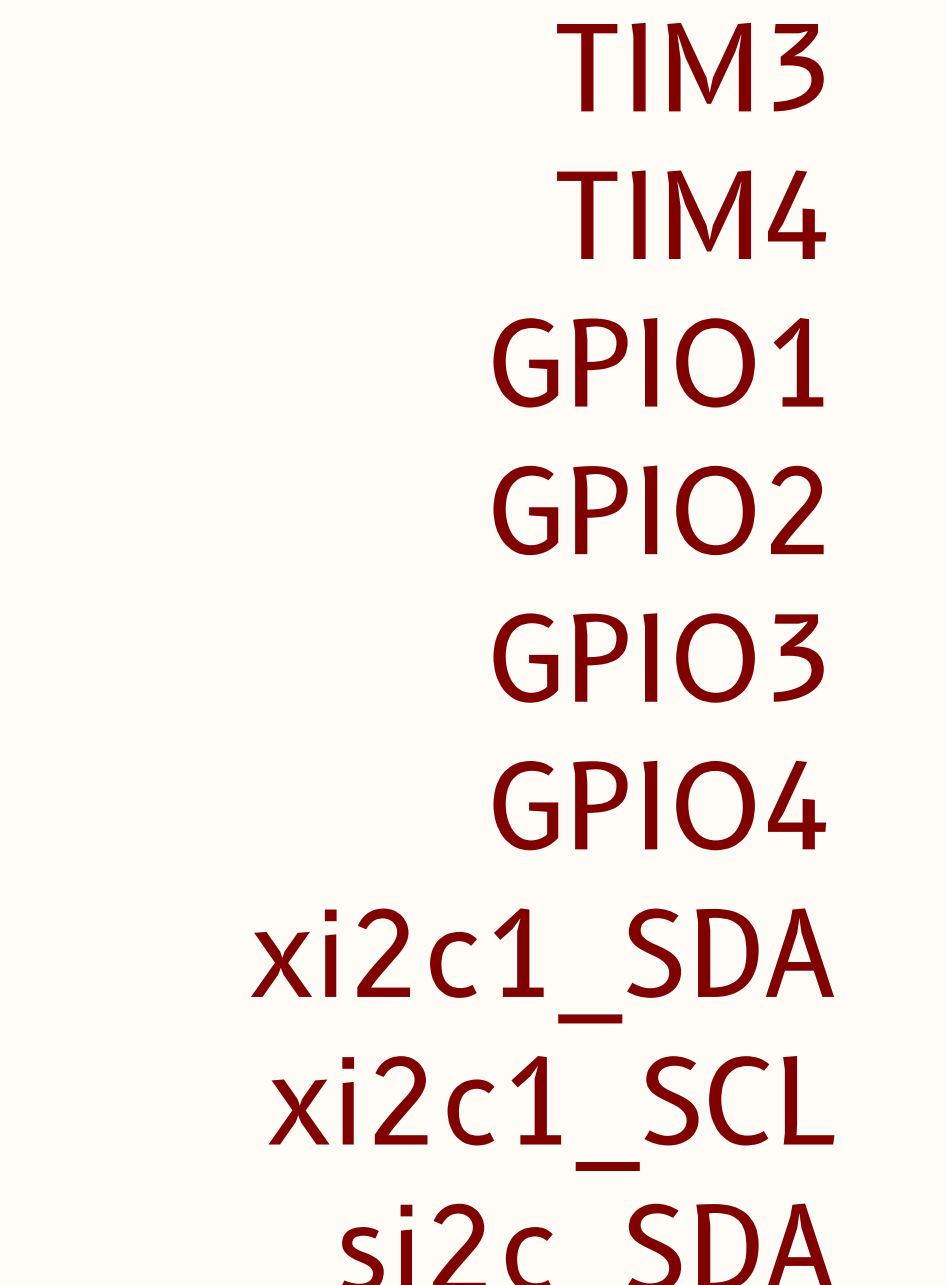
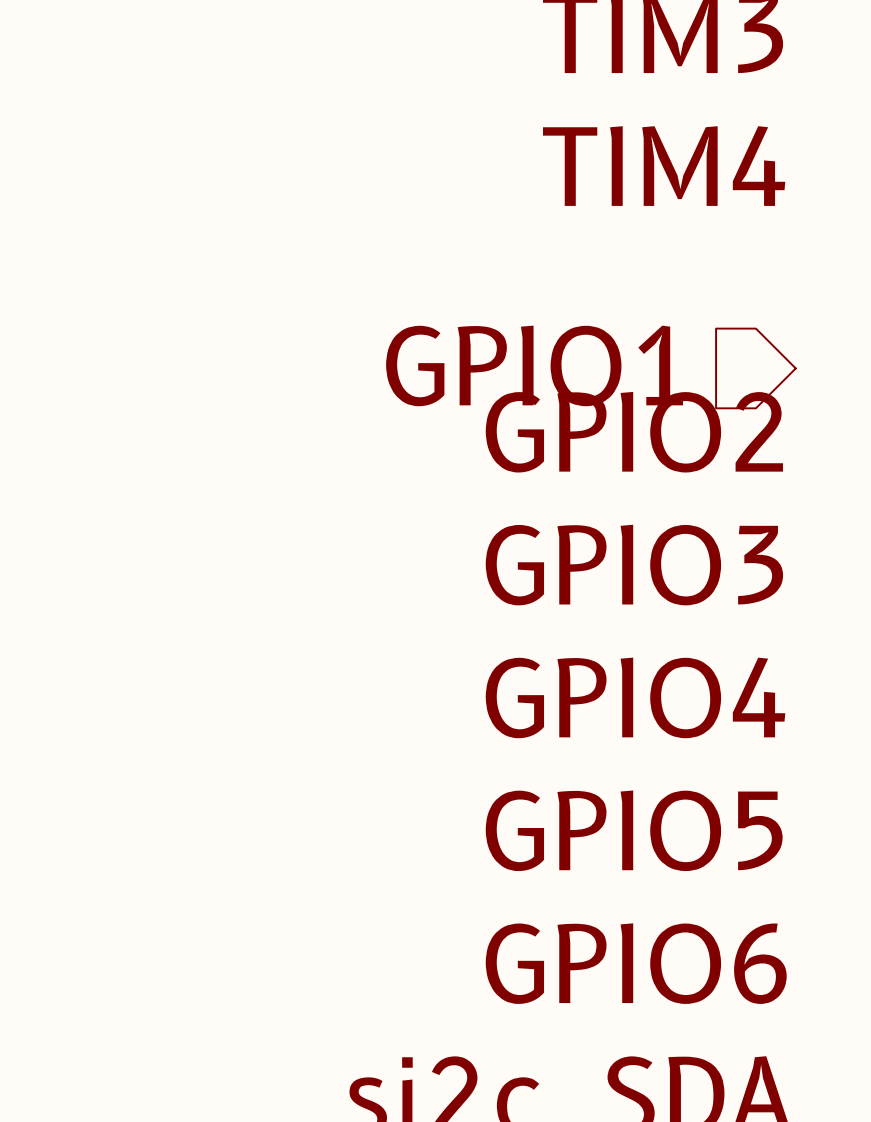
label: GPIO1 (658, 362) -> none
hierarchical label: none -> GPIO1 (534, 365)
label: xi2c1_SDA (542, 965) -> GPIO5 (634, 830)
label: xi2c1_SCL (551, 1113) -> GPIO6 (636, 963)

